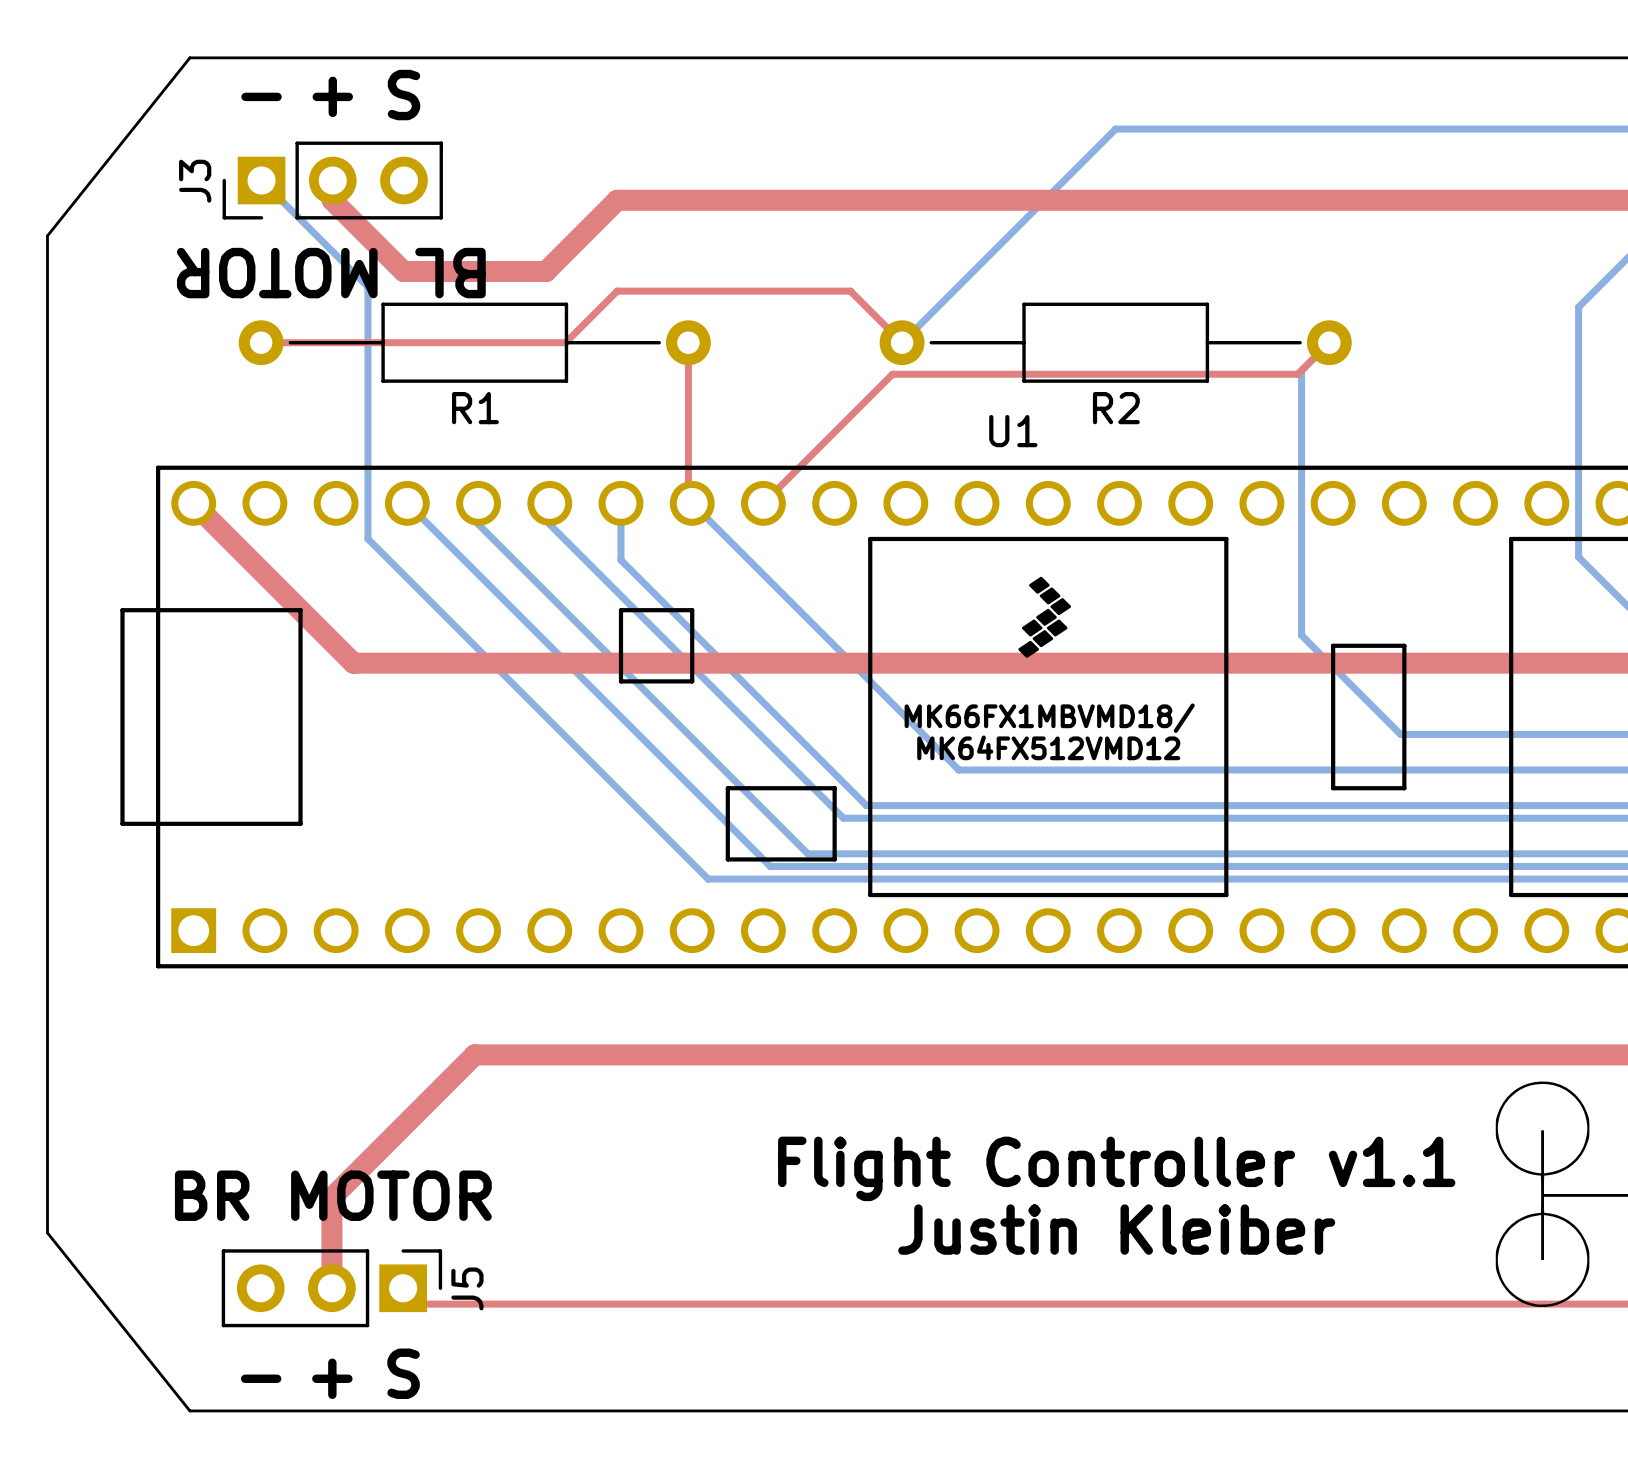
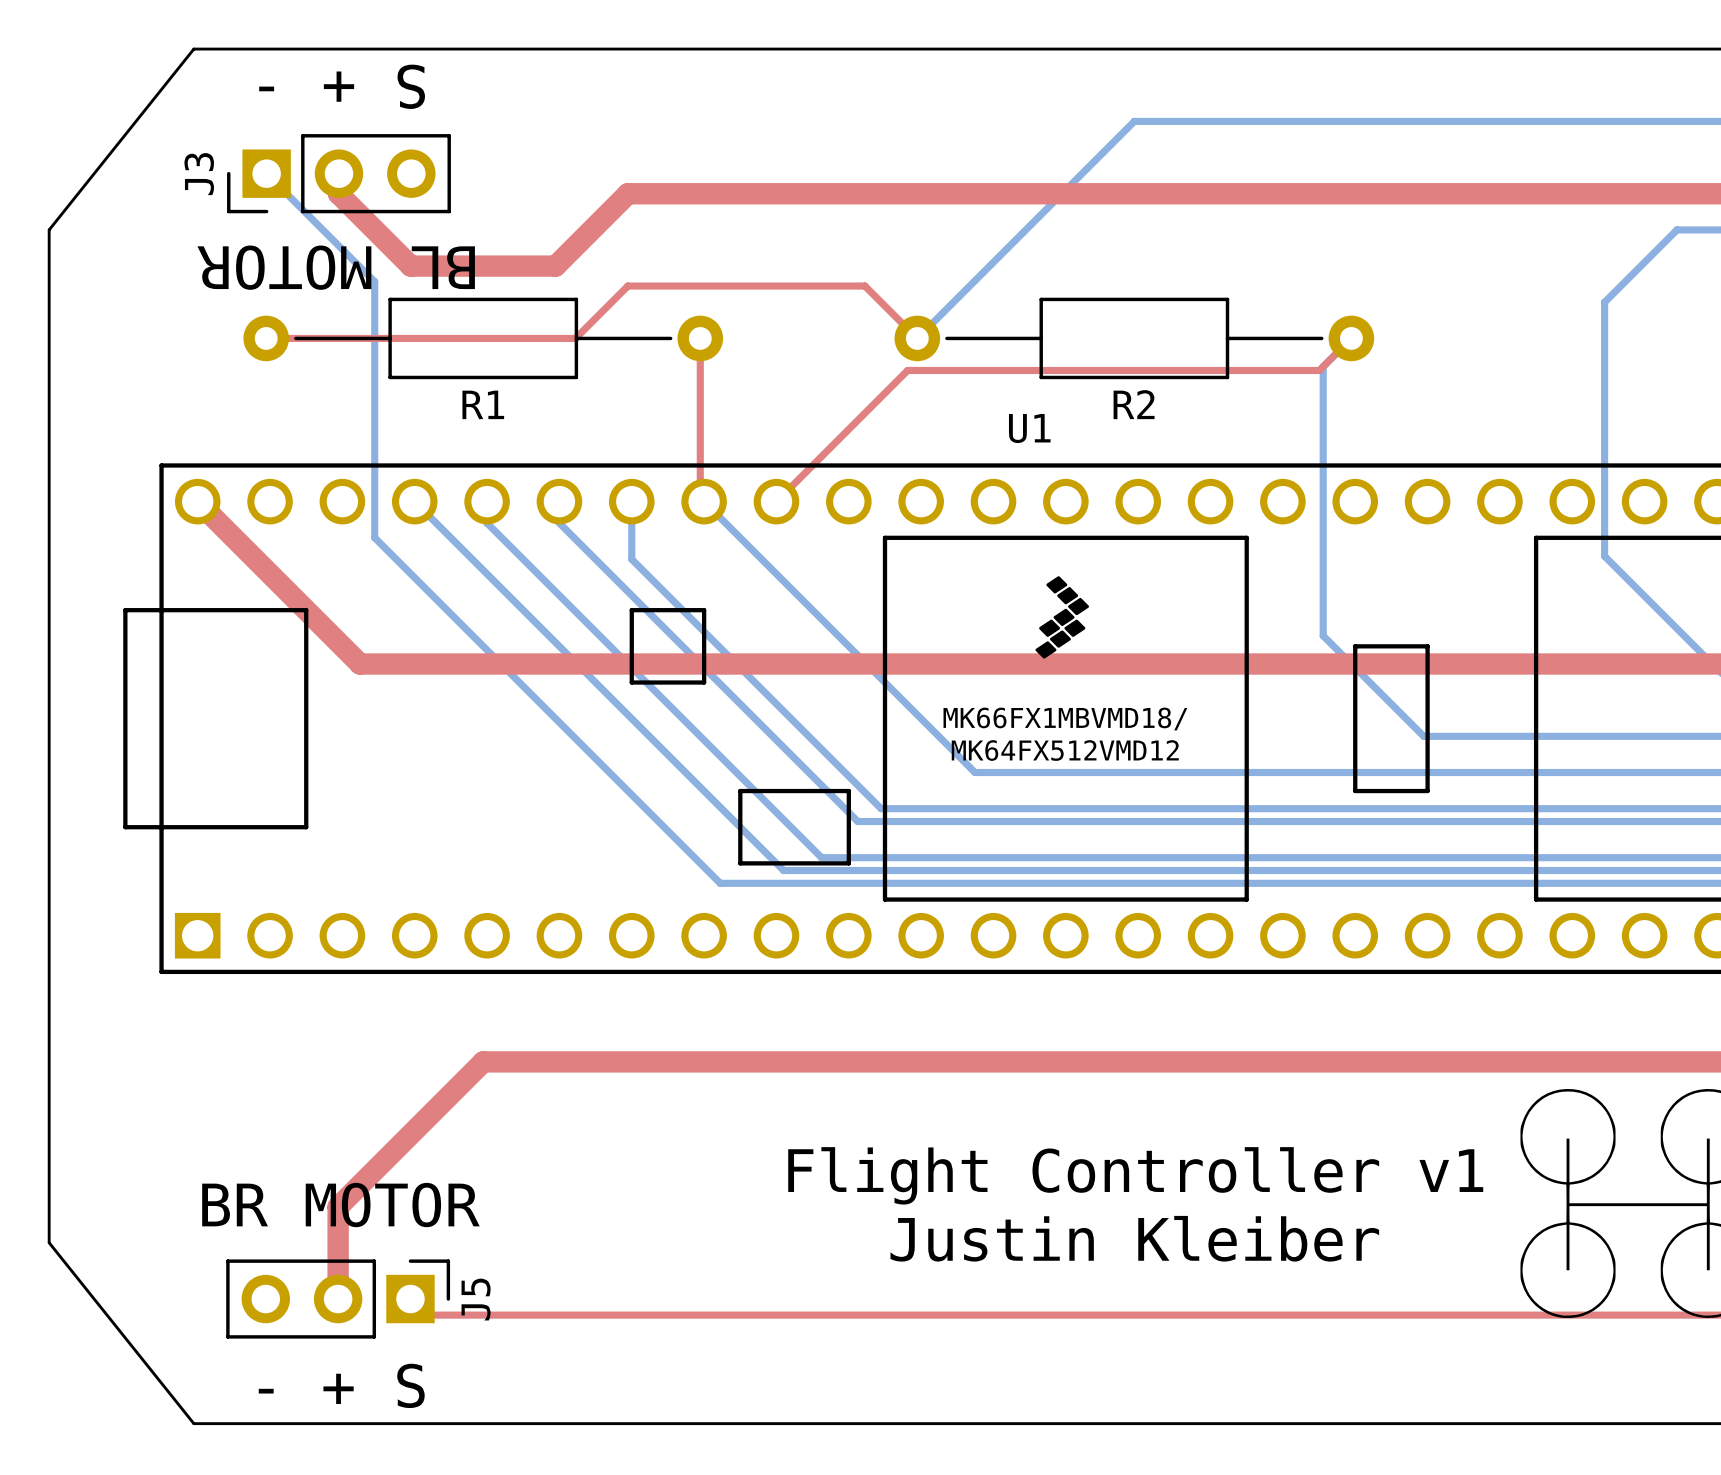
text: Flight Controller v1.1 (1116, 1168) -> Flight Controller v1 (1135, 1175)

